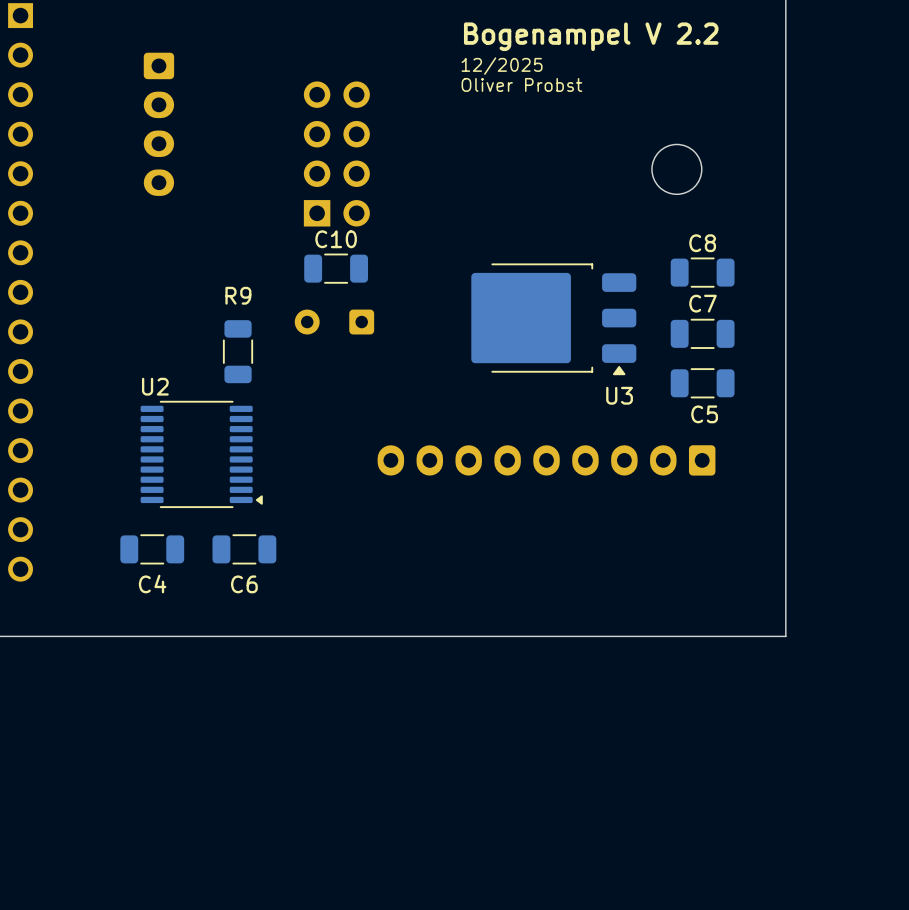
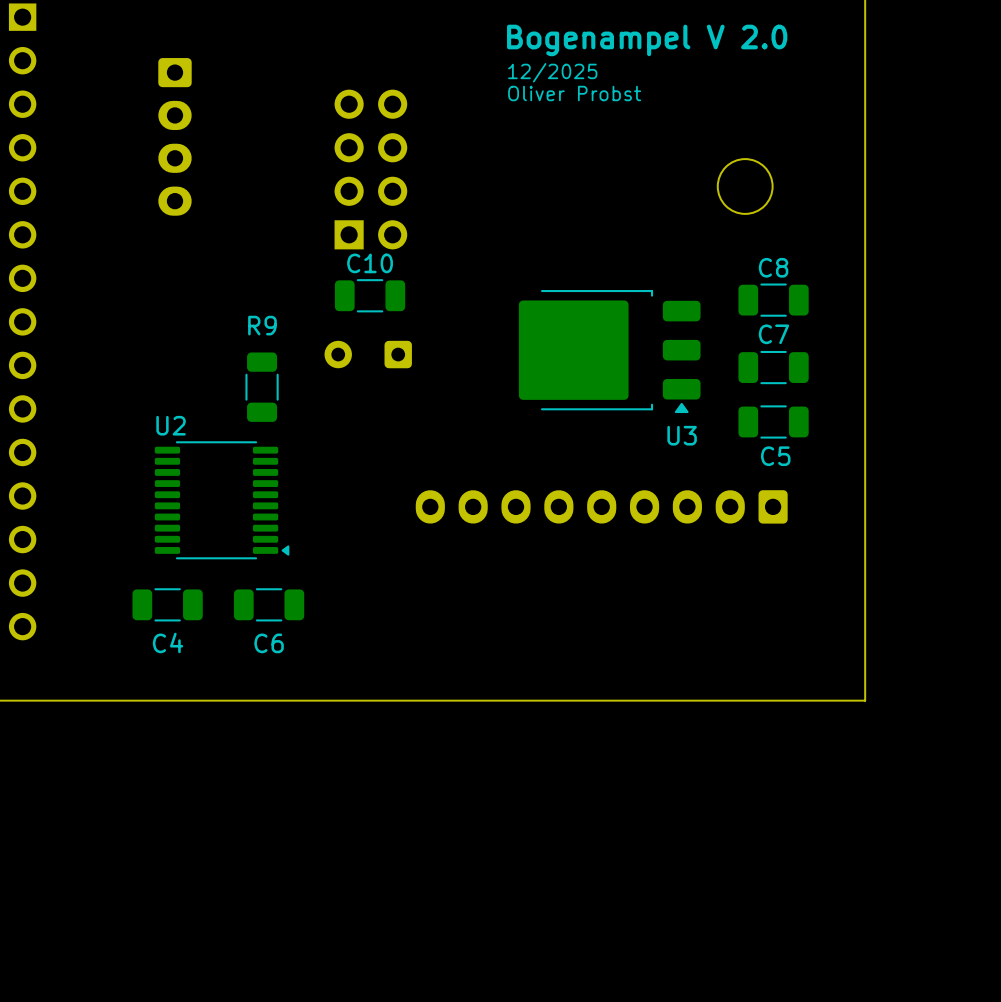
text: Bogenampel V 2.2 (591, 36) -> Bogenampel V 2.0 (647, 40)

